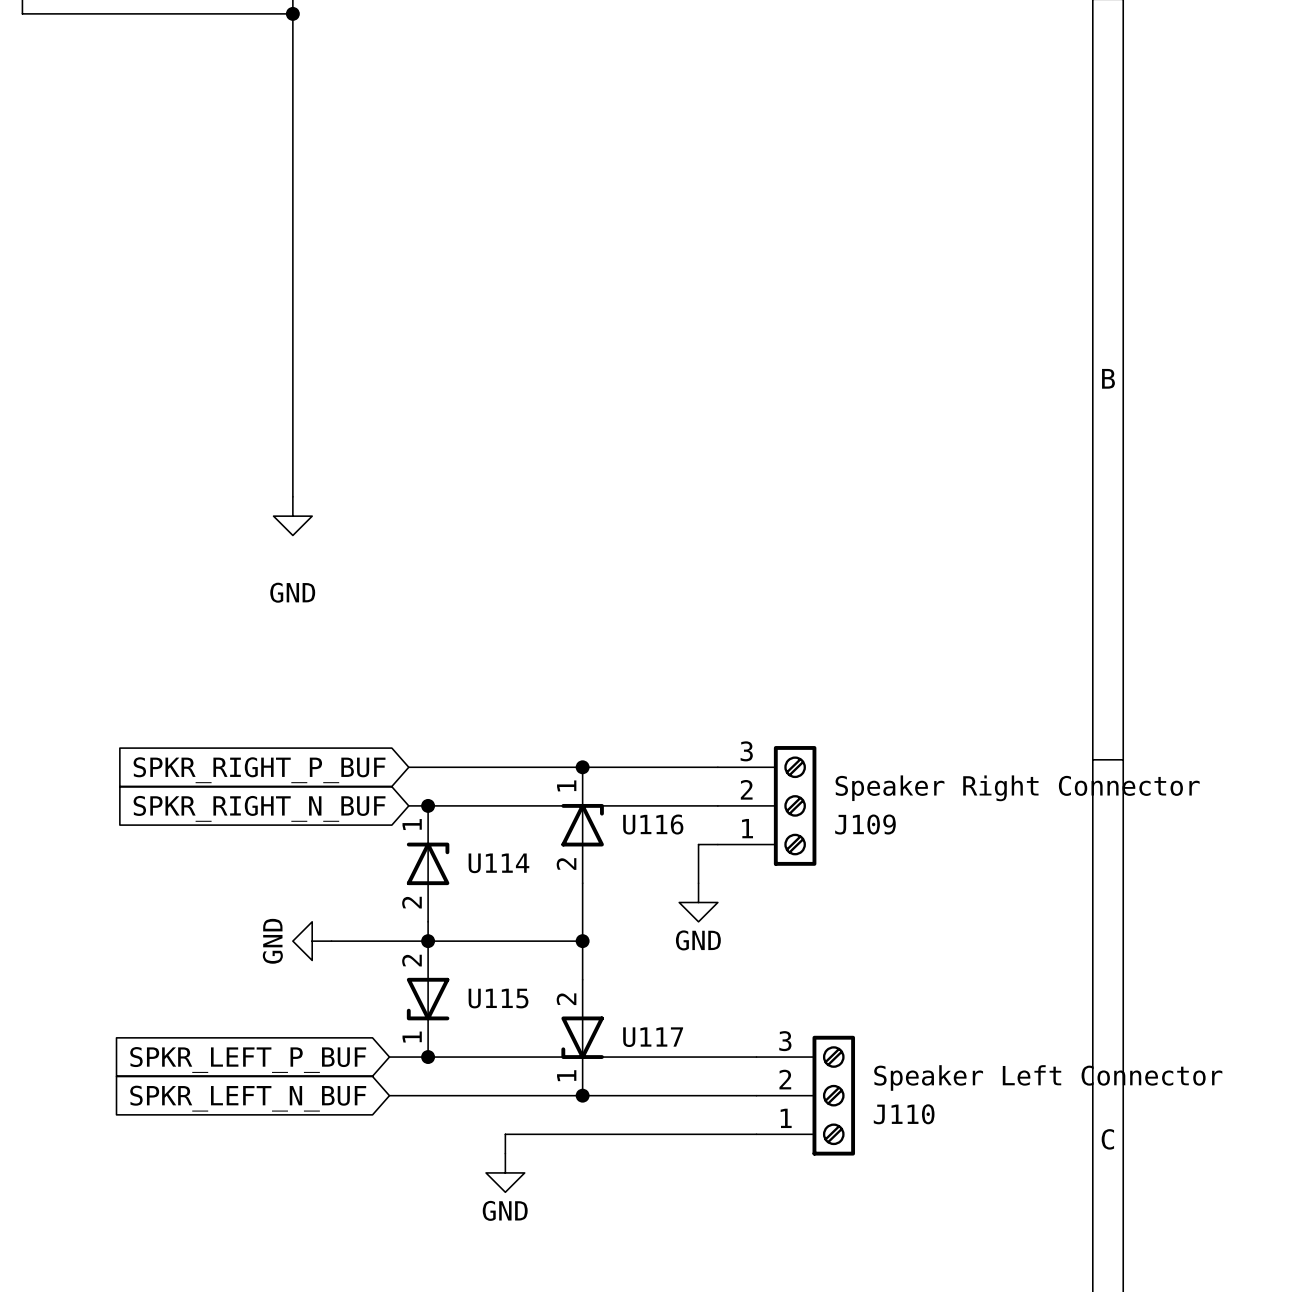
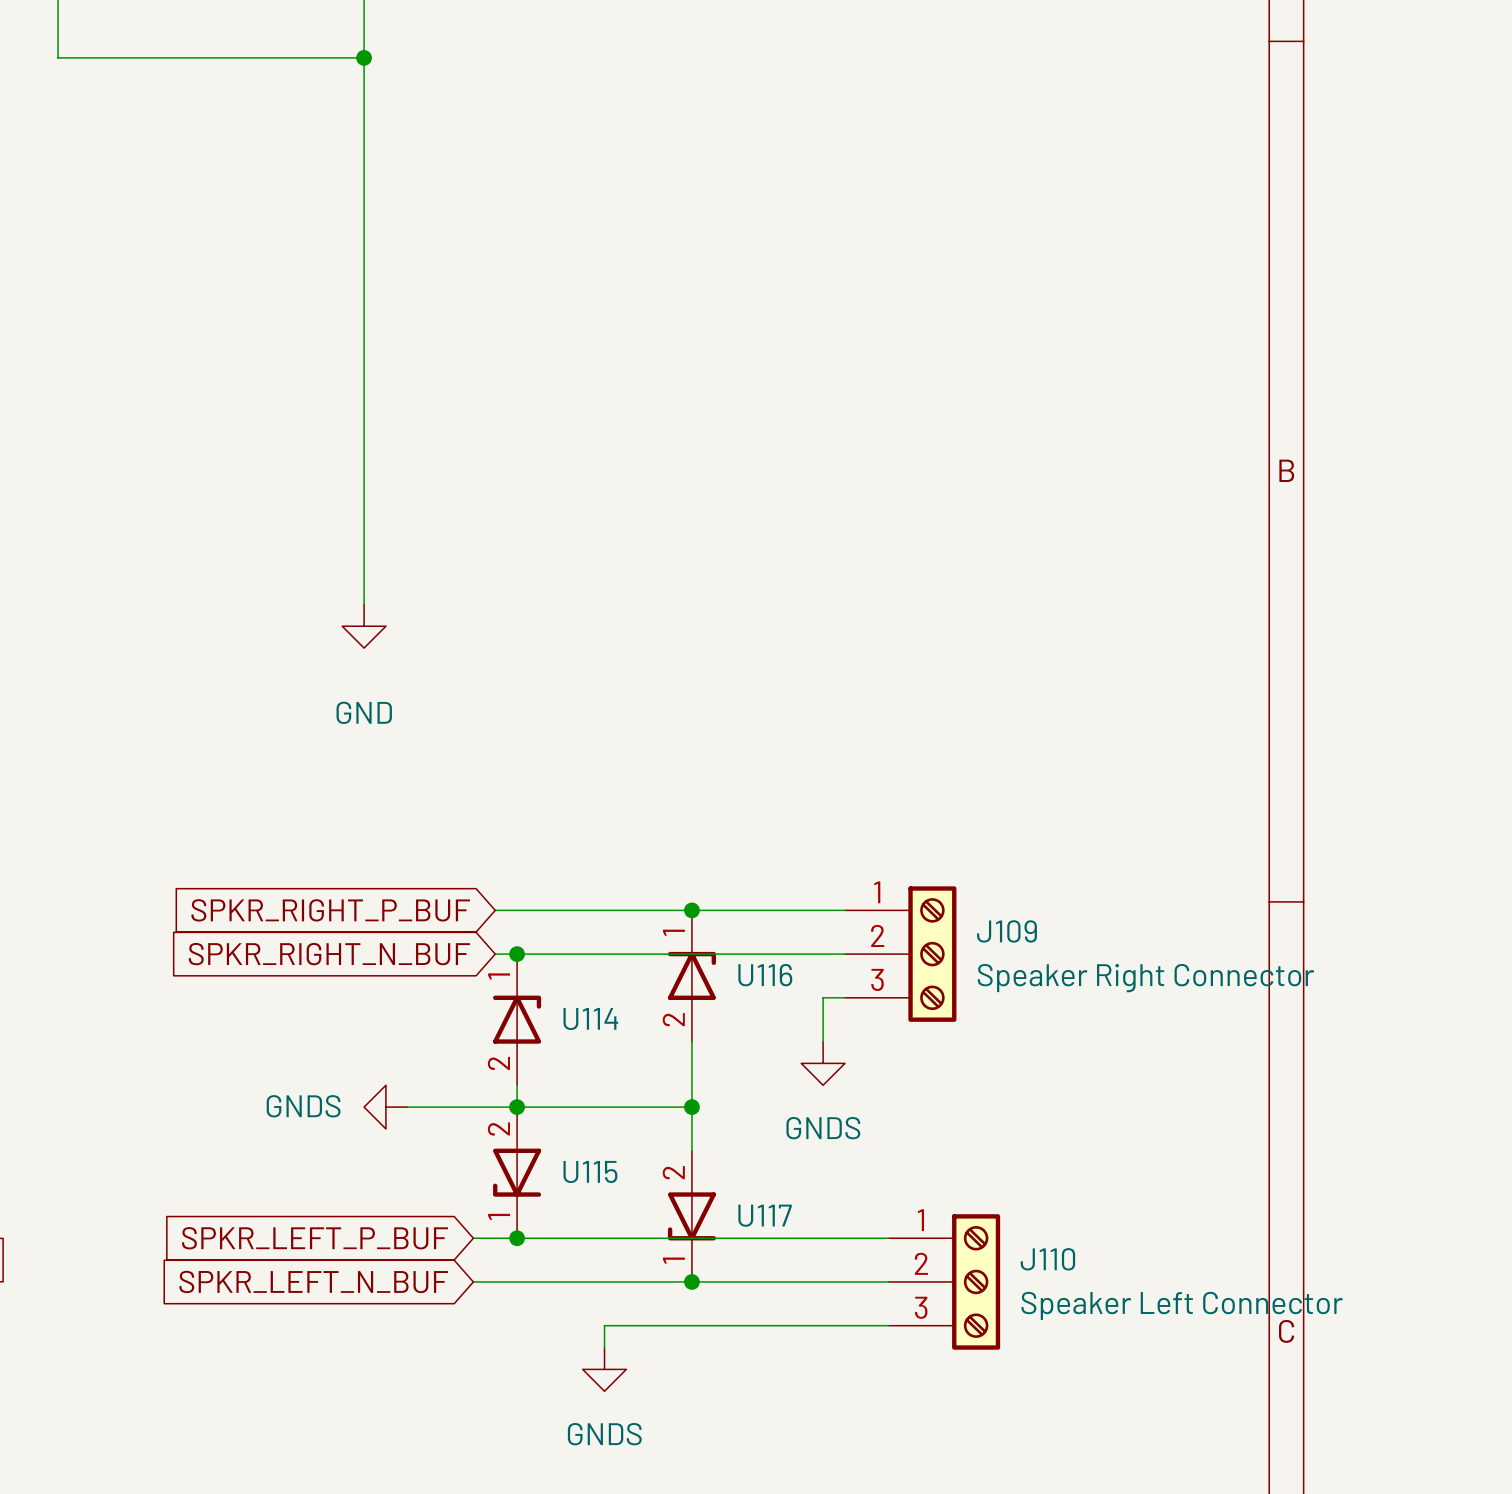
J109 flip: as is (795, 805) -> up-down (932, 954)
power symbol: GND (698, 902) -> GNDS (823, 1063)
power symbol: GND (312, 941) -> GNDS (385, 1107)
J110 flip: as is (833, 1095) -> up-down (976, 1281)
power symbol: GND (505, 1172) -> GNDS (604, 1369)

